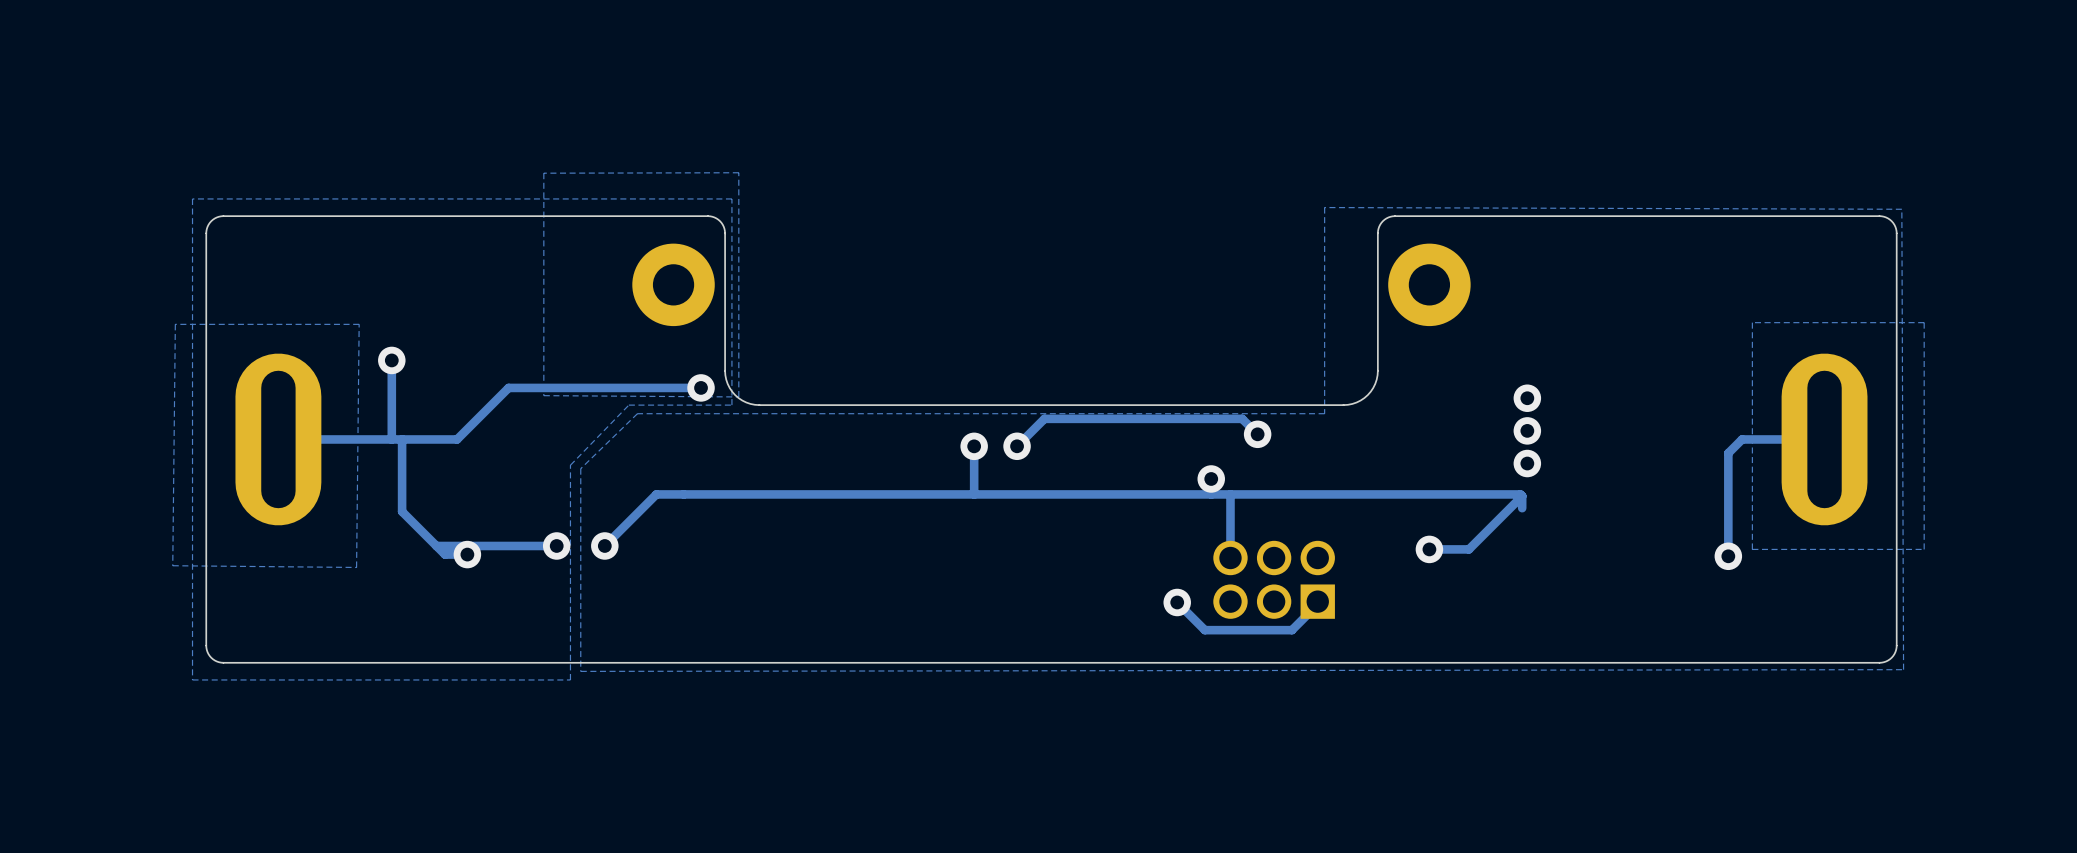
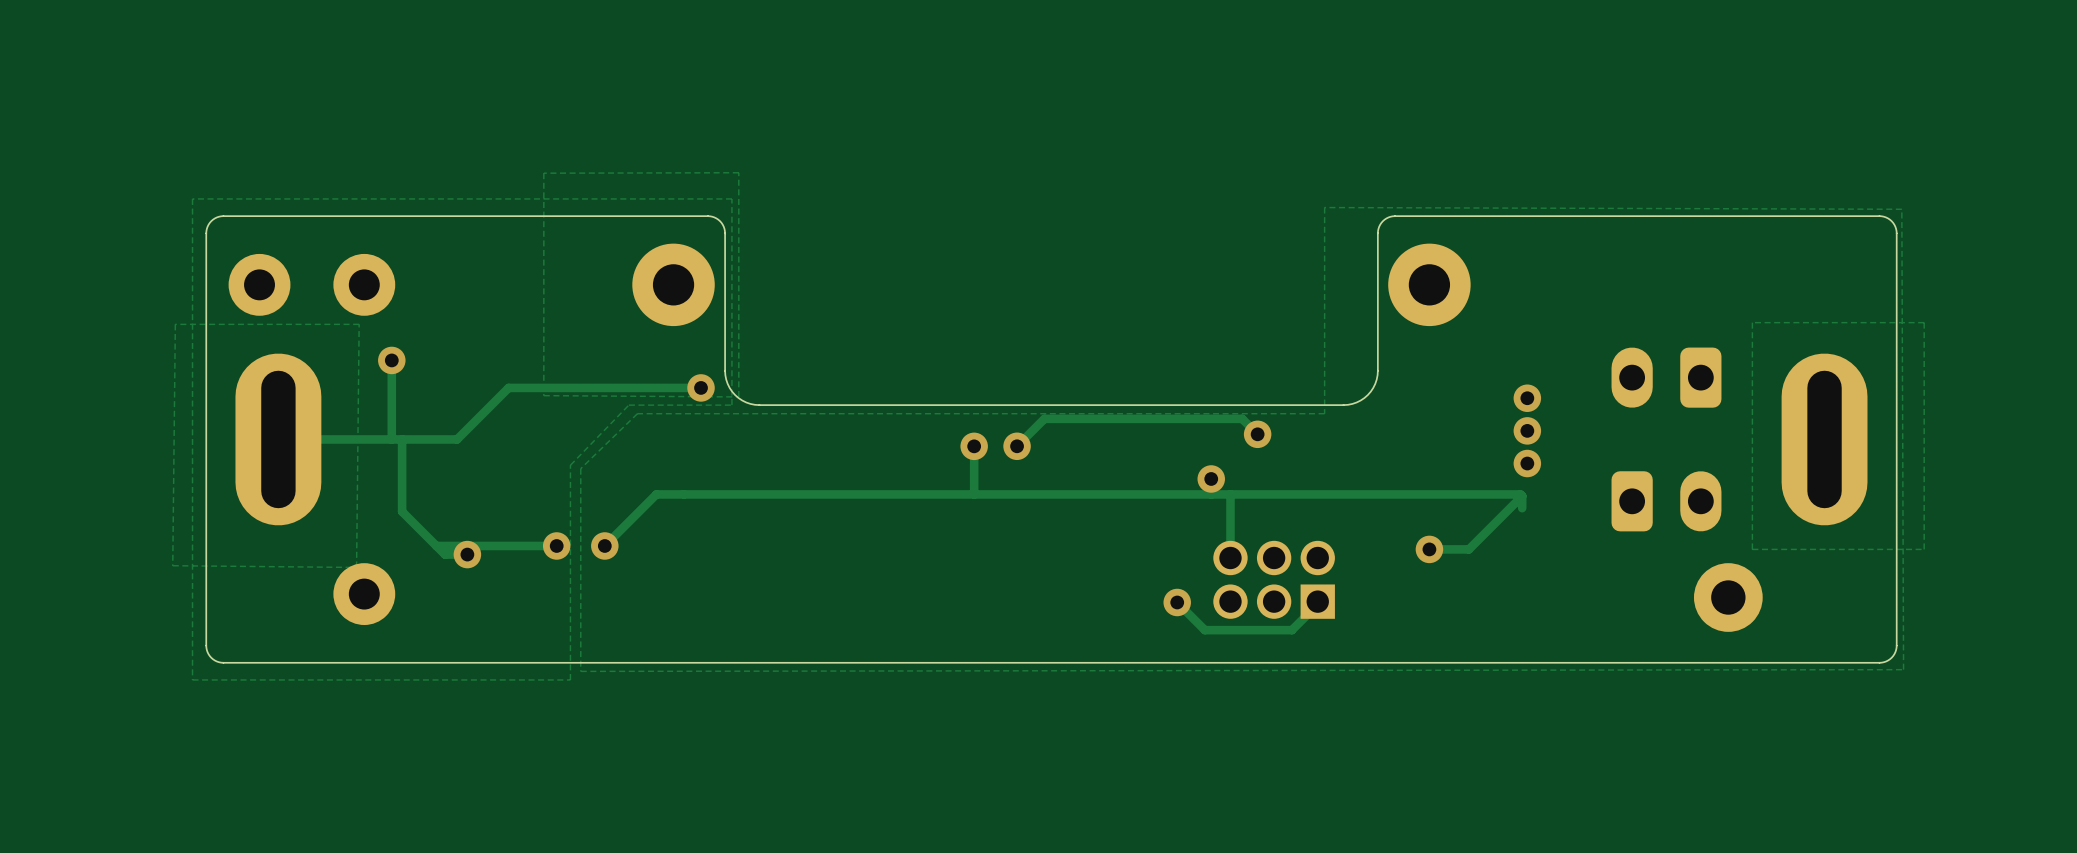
part: none -> (259, 284)
part: none -> (364, 284)
part: none -> (1666, 377)
track: (1824, 439) (1742, 439) (1728, 453) (1728, 556) -> none
part: none -> (1666, 501)
via: (1728, 556) -> none
part: none -> (364, 594)
part: none -> (1728, 597)

